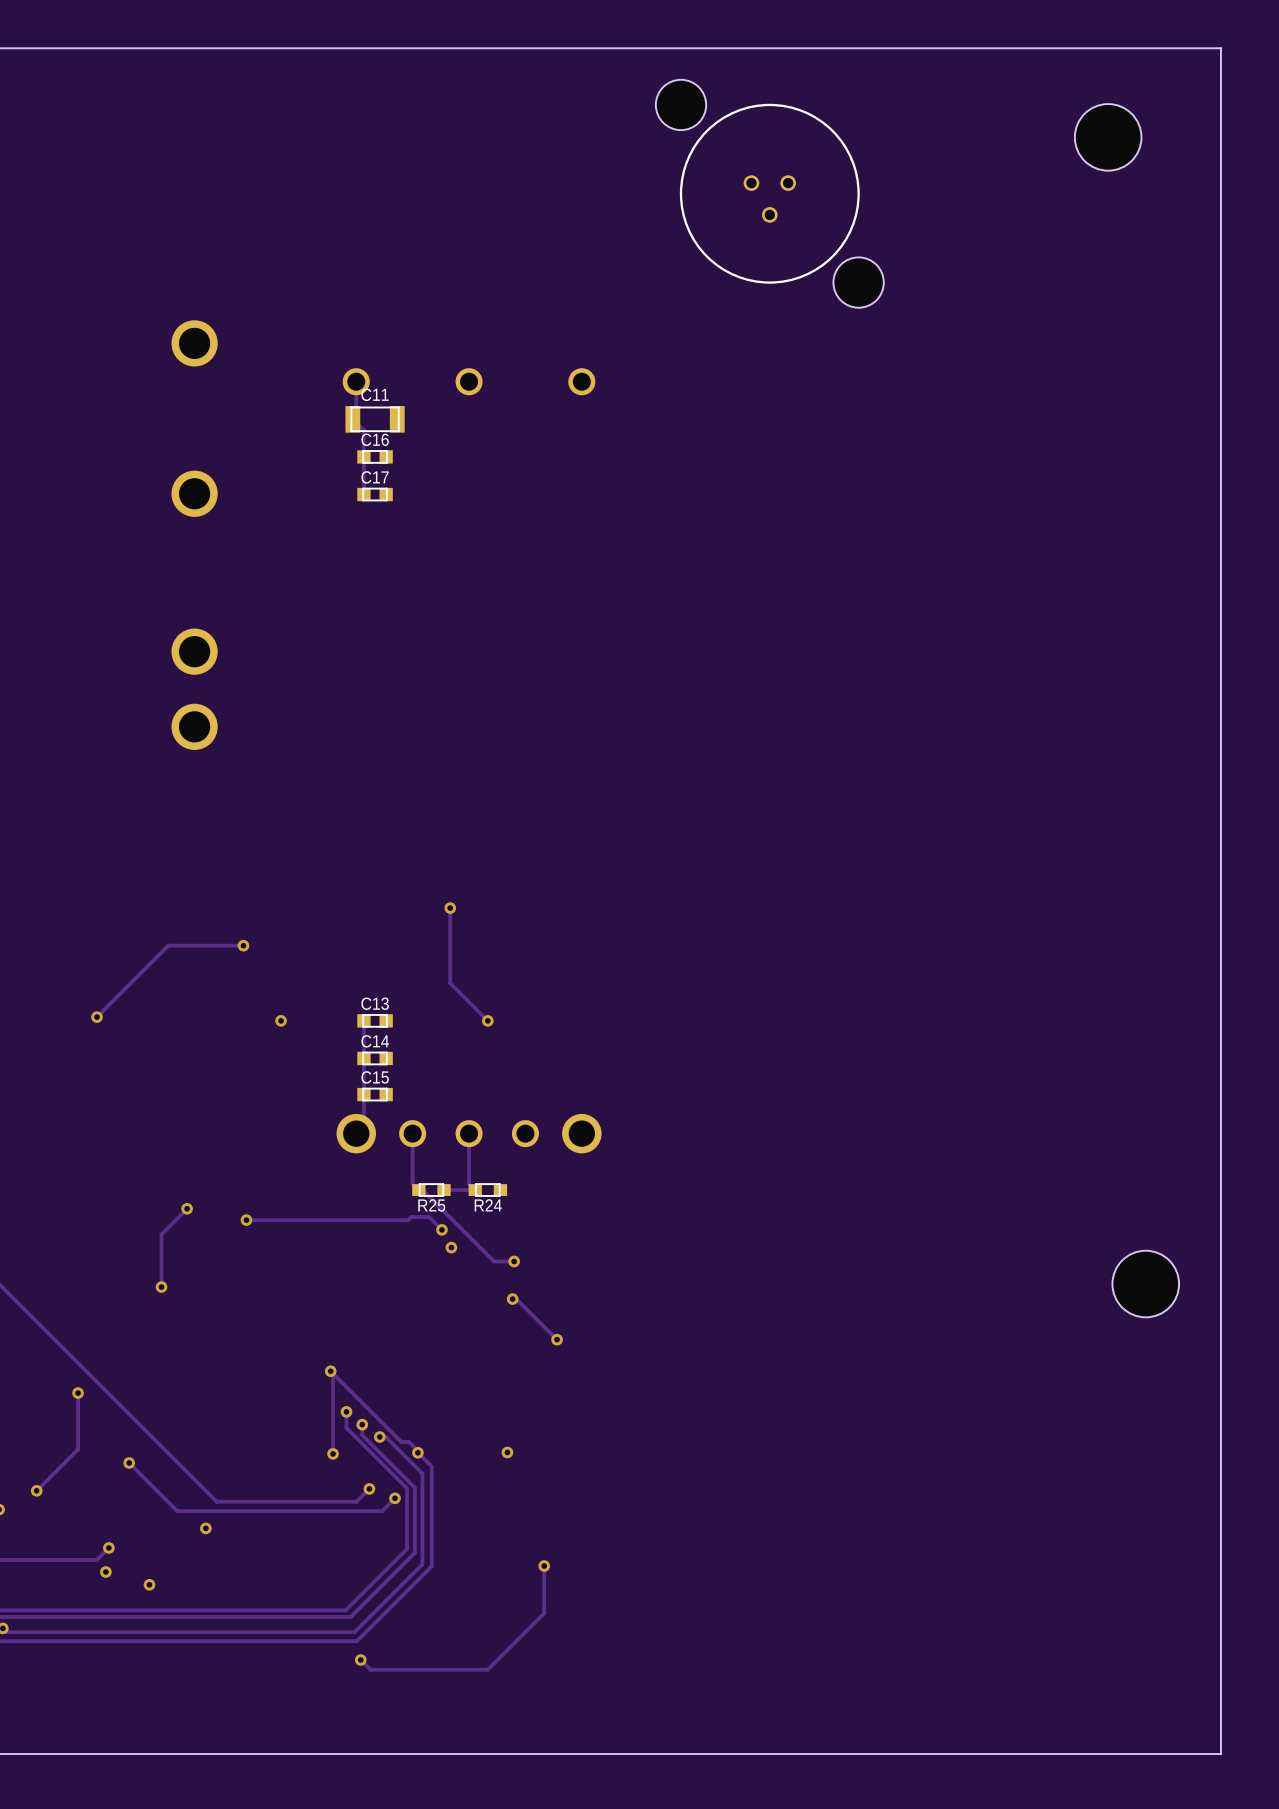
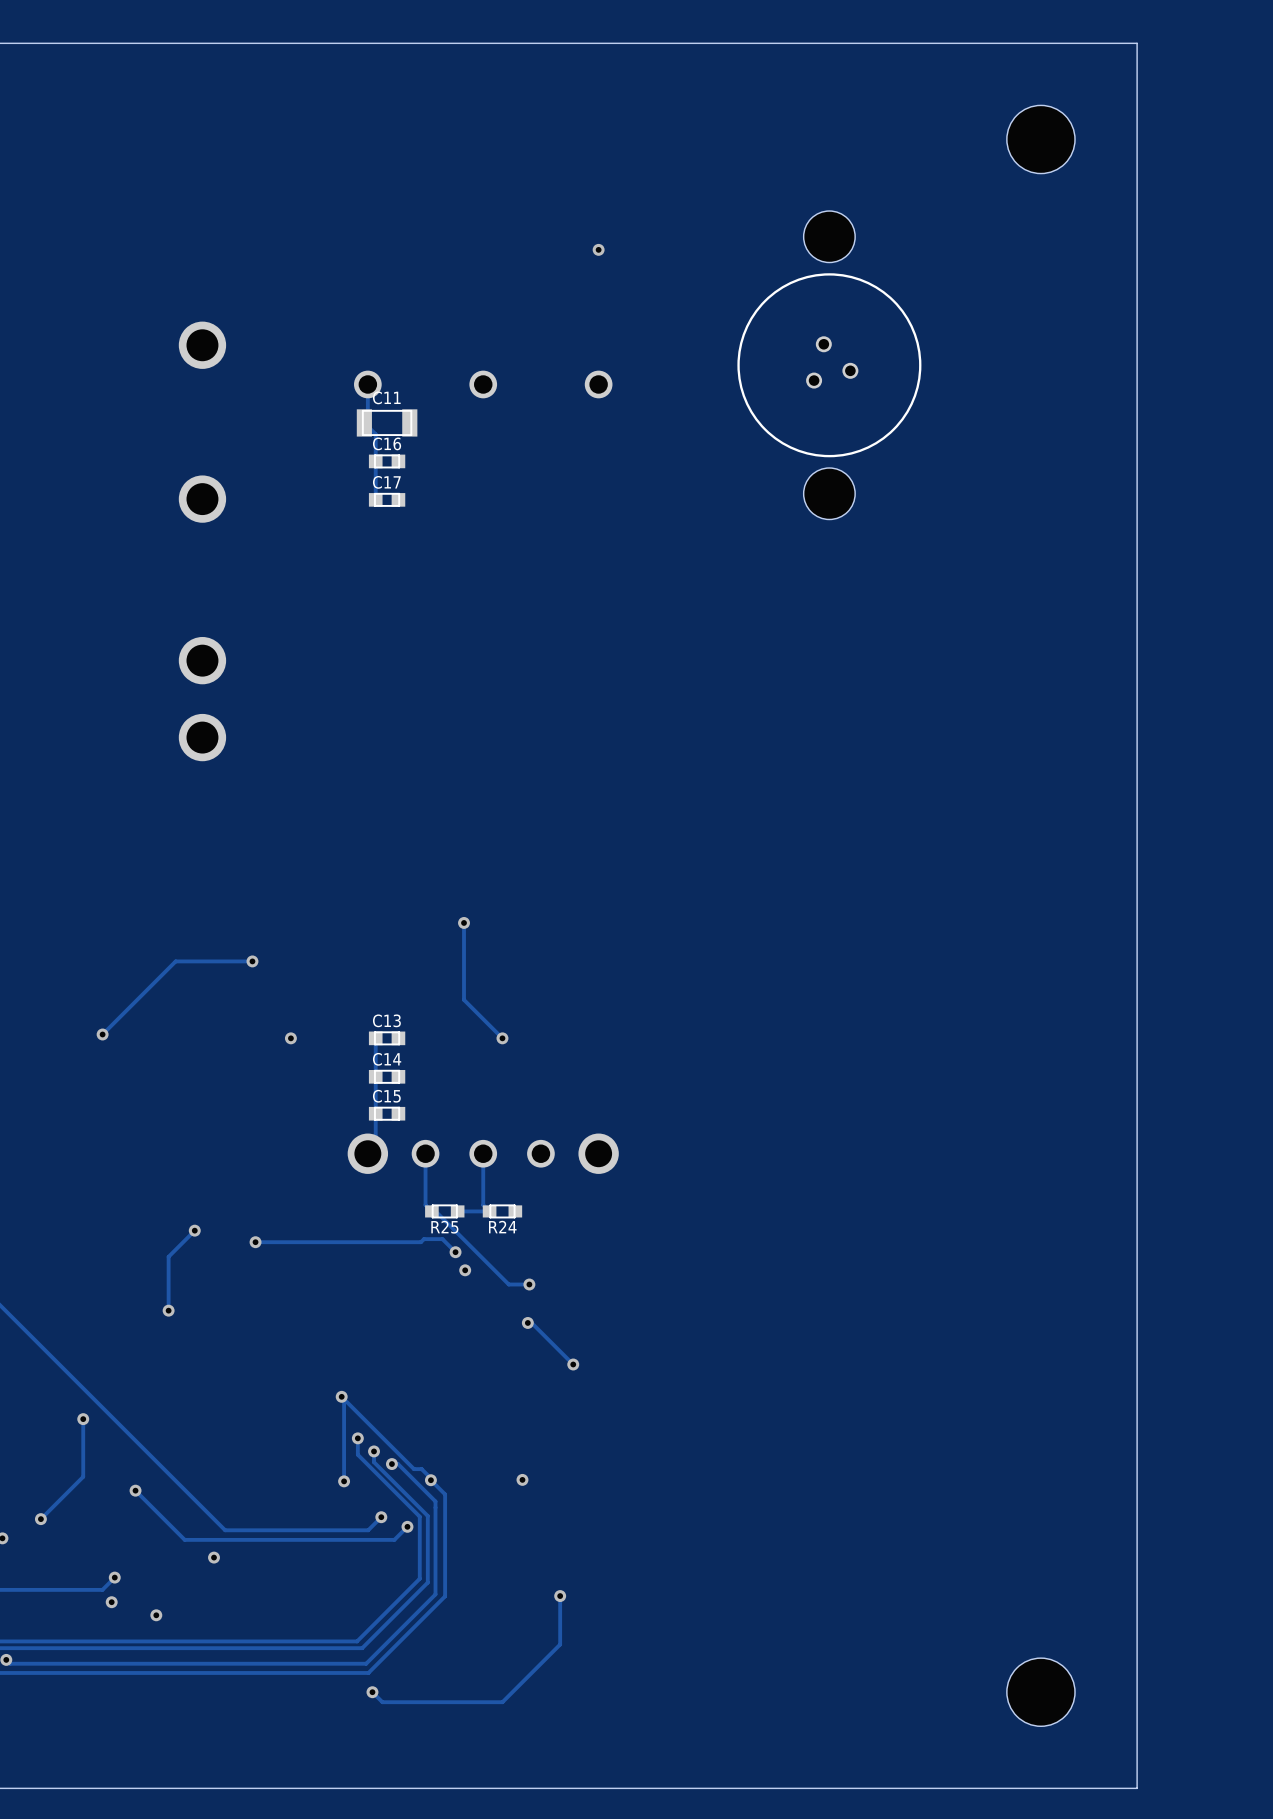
board edge: (1108, 48) (1220, 48) (1220, 1753) (1108, 1753) -> (1137, 43) (1137, 1788)
part position: (1108, 137) -> (1040, 139)
part: (769, 193) -> none
via: none -> (598, 249)
part: none -> (829, 365)
part: (1145, 1284) -> none
part: none -> (1040, 1692)

